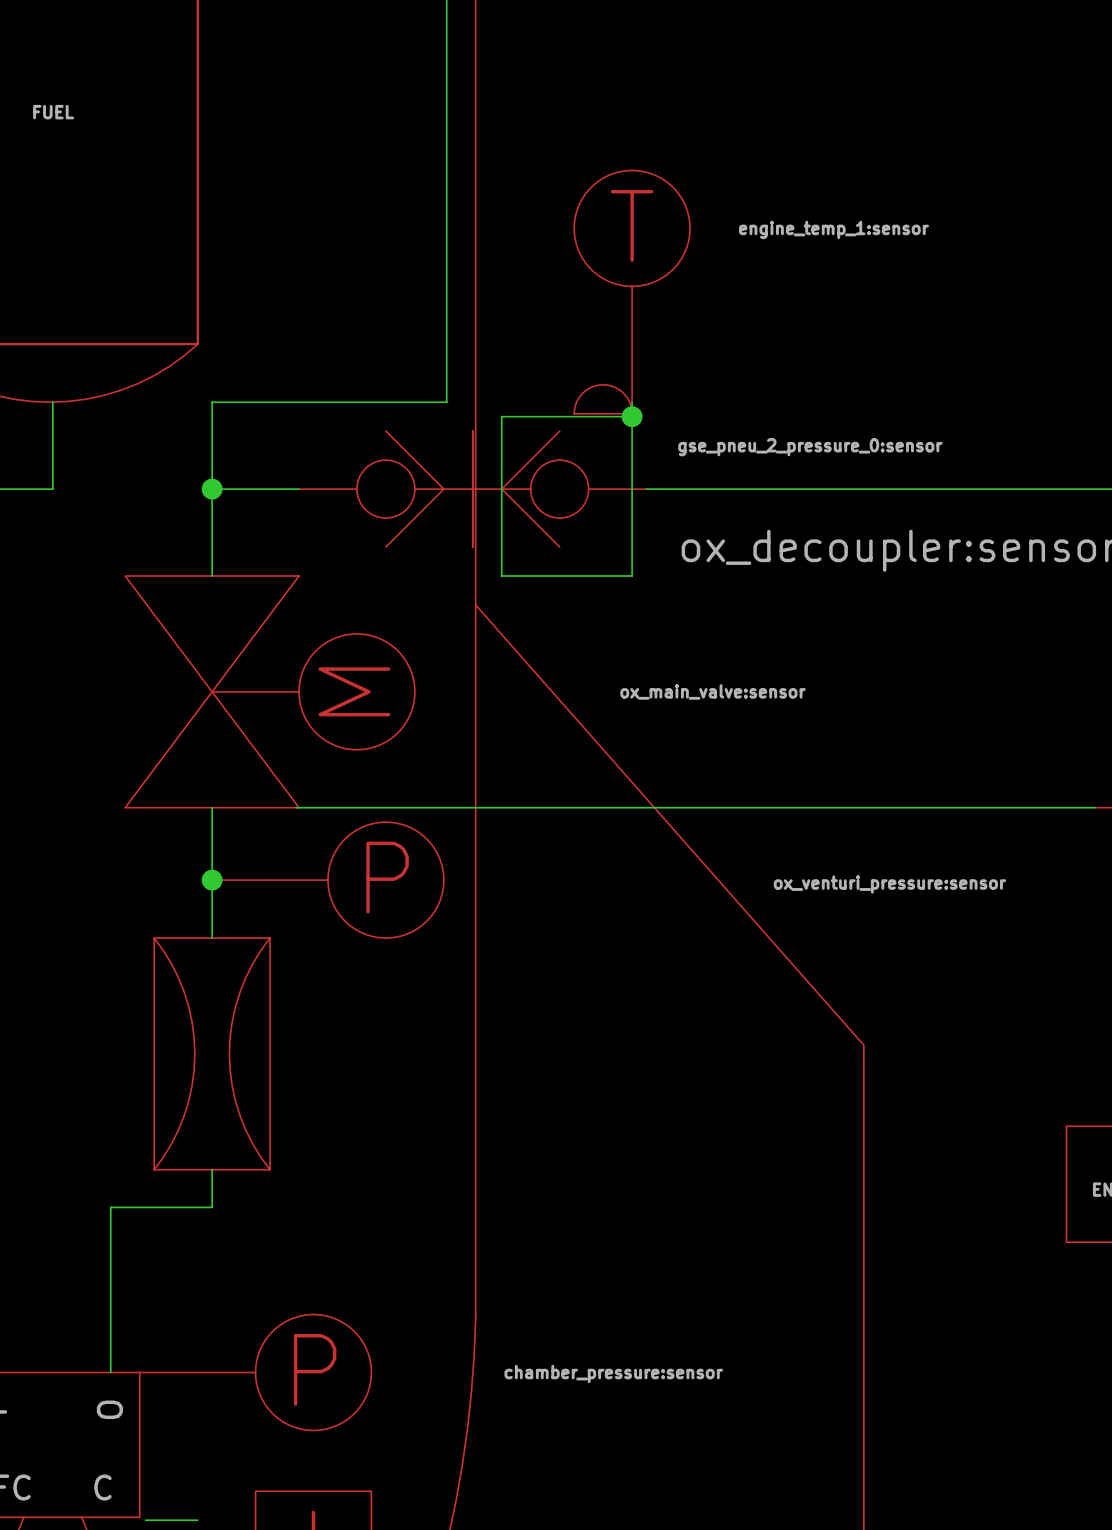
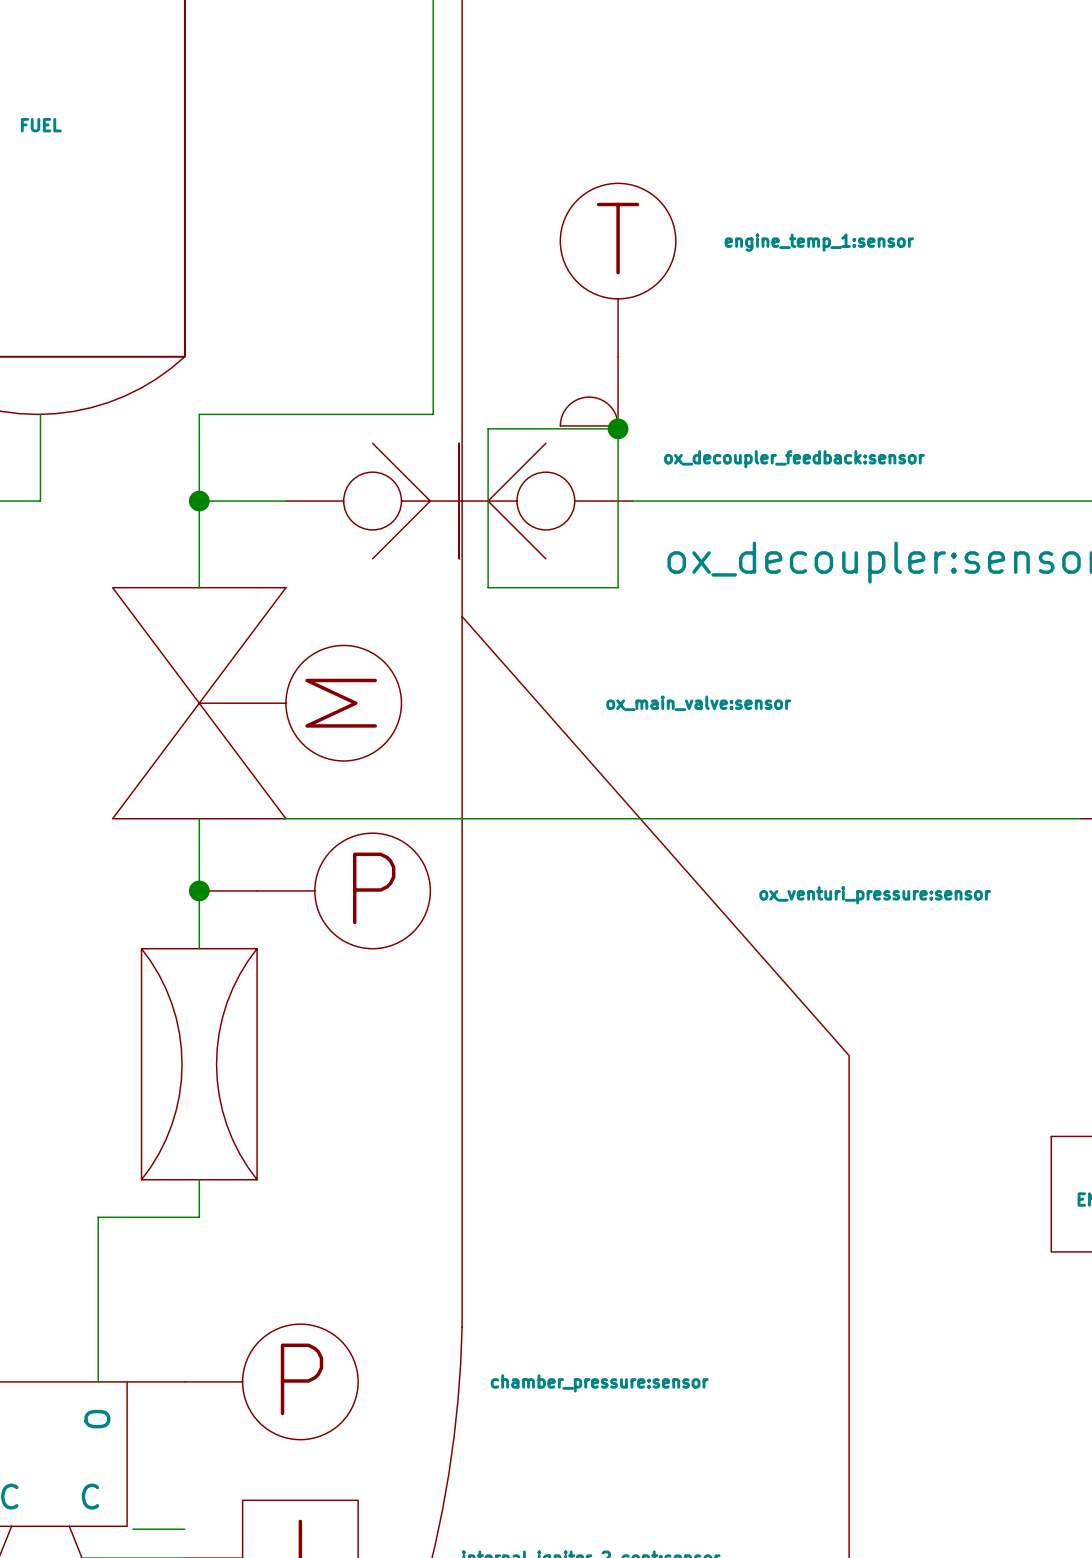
part value: gse_pneu_2_pressure_0:sensor (810, 447) -> ox_decoupler_feedback:sensor (794, 459)

